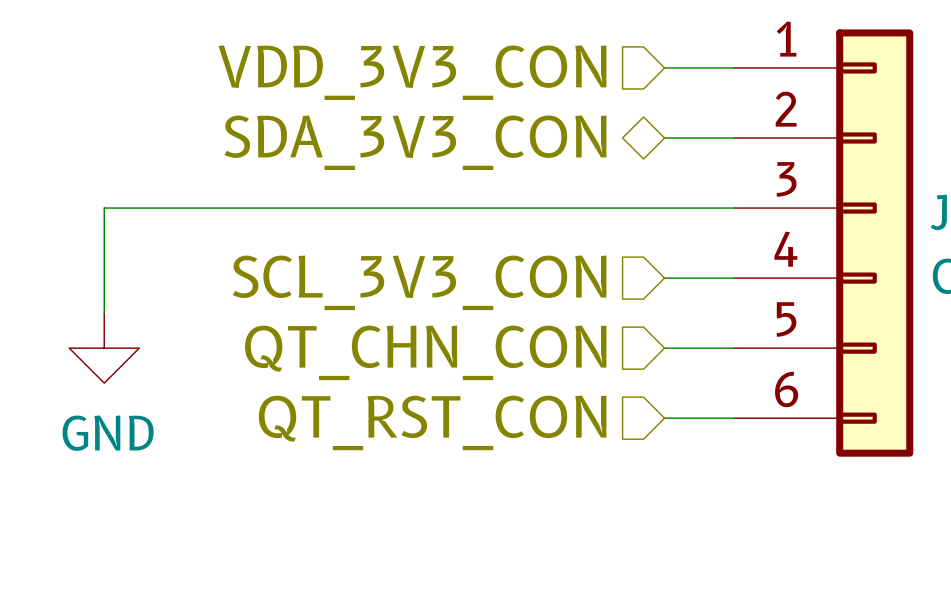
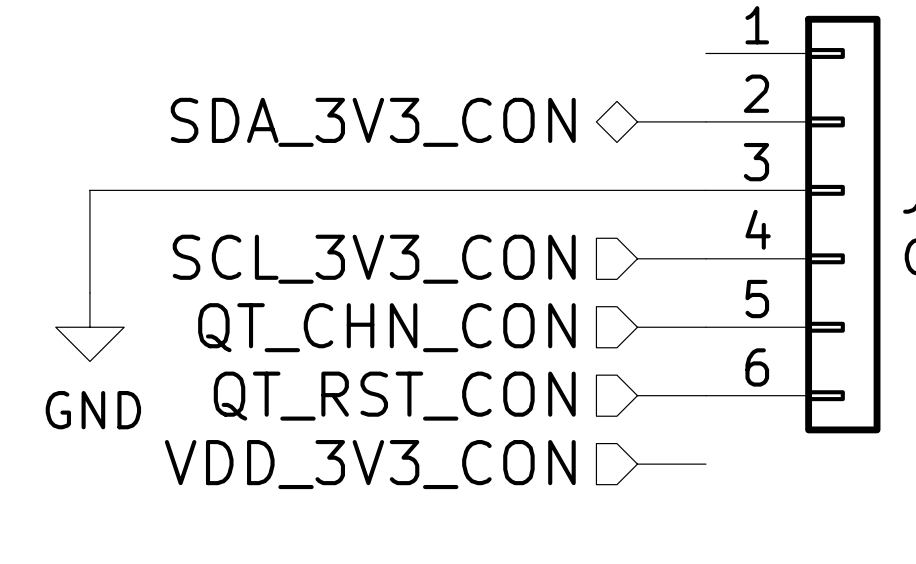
wire: (664, 67) (734, 67) -> (637, 464) (705, 464)
hierarchical label position: VDD_3V3_CON (412, 72) -> VDD_3V3_CON (370, 464)

